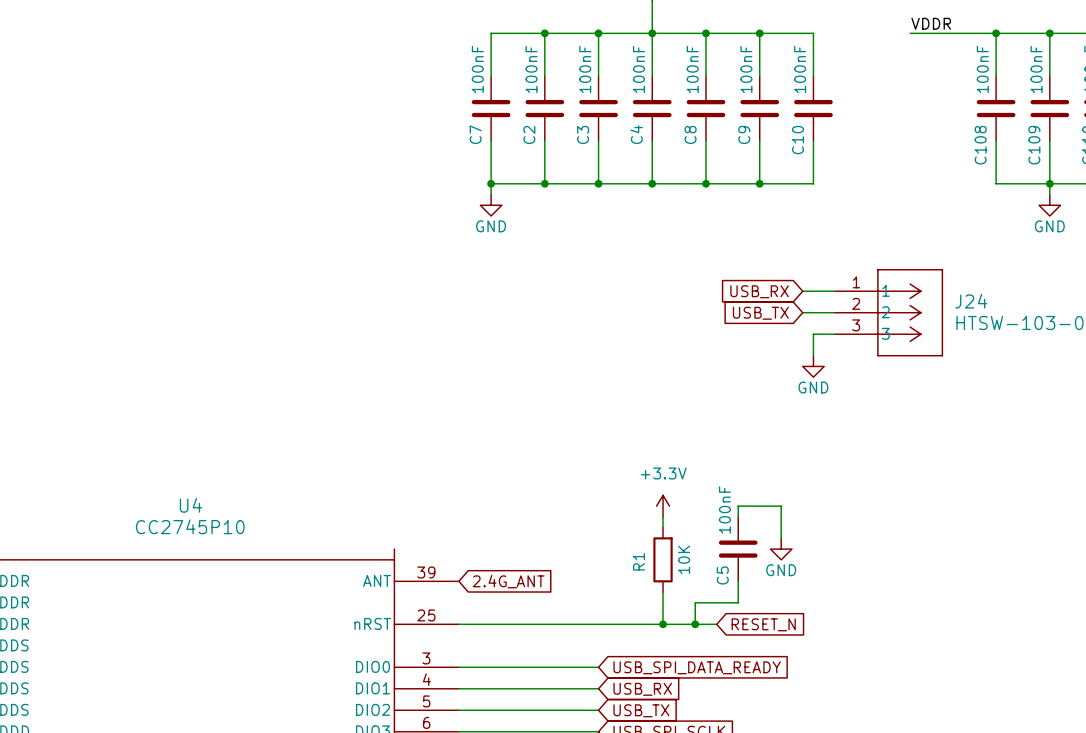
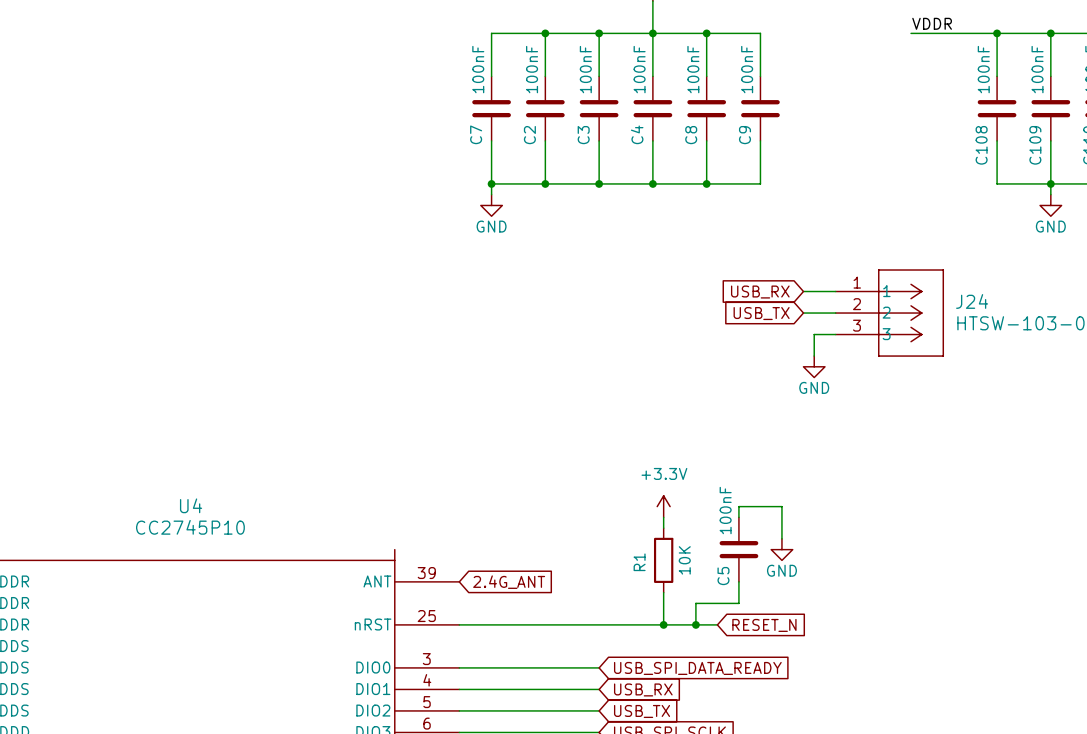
wire: (759, 33) (813, 33) (813, 76) -> none
junction: (759, 33) -> none
C10: 100nF (813, 108) -> none
wire: (813, 140) (813, 183) (759, 183) -> none
junction: (759, 183) -> none

